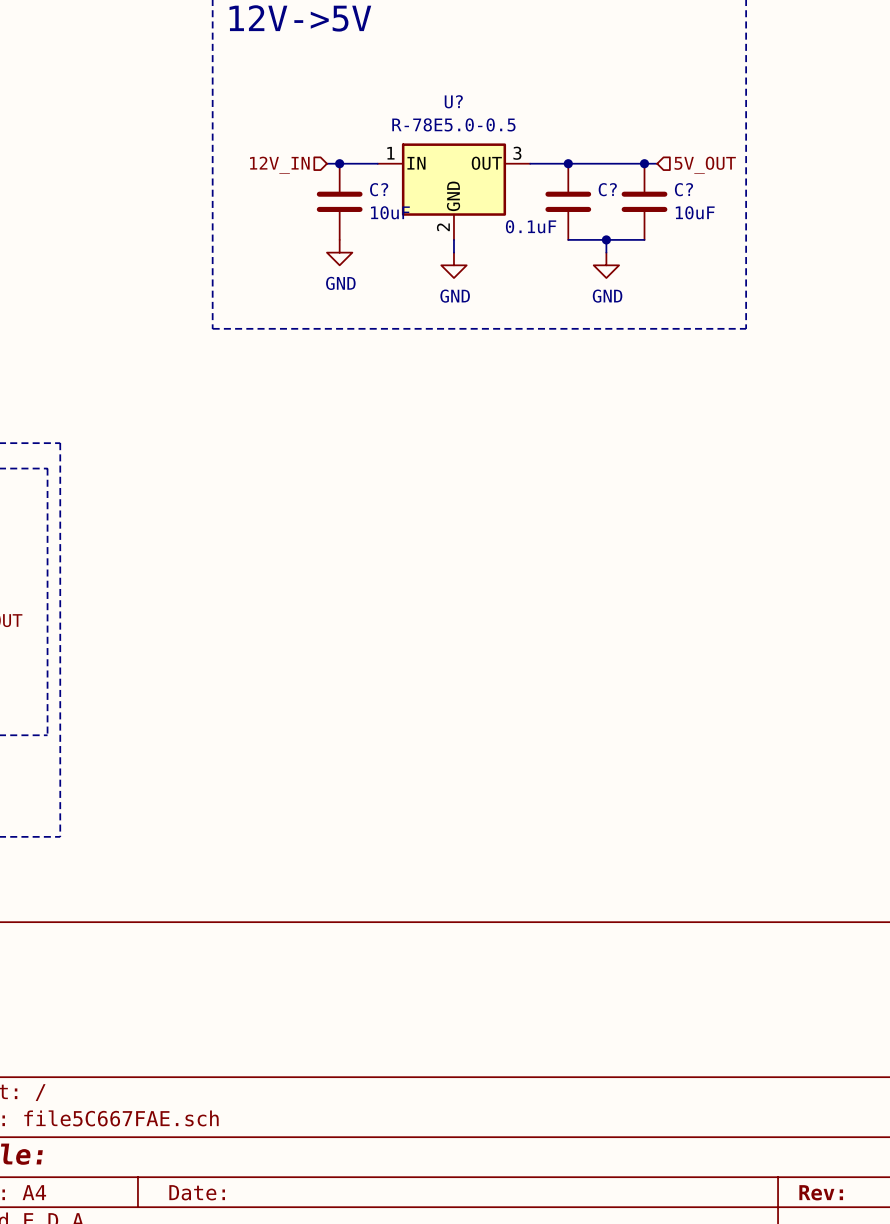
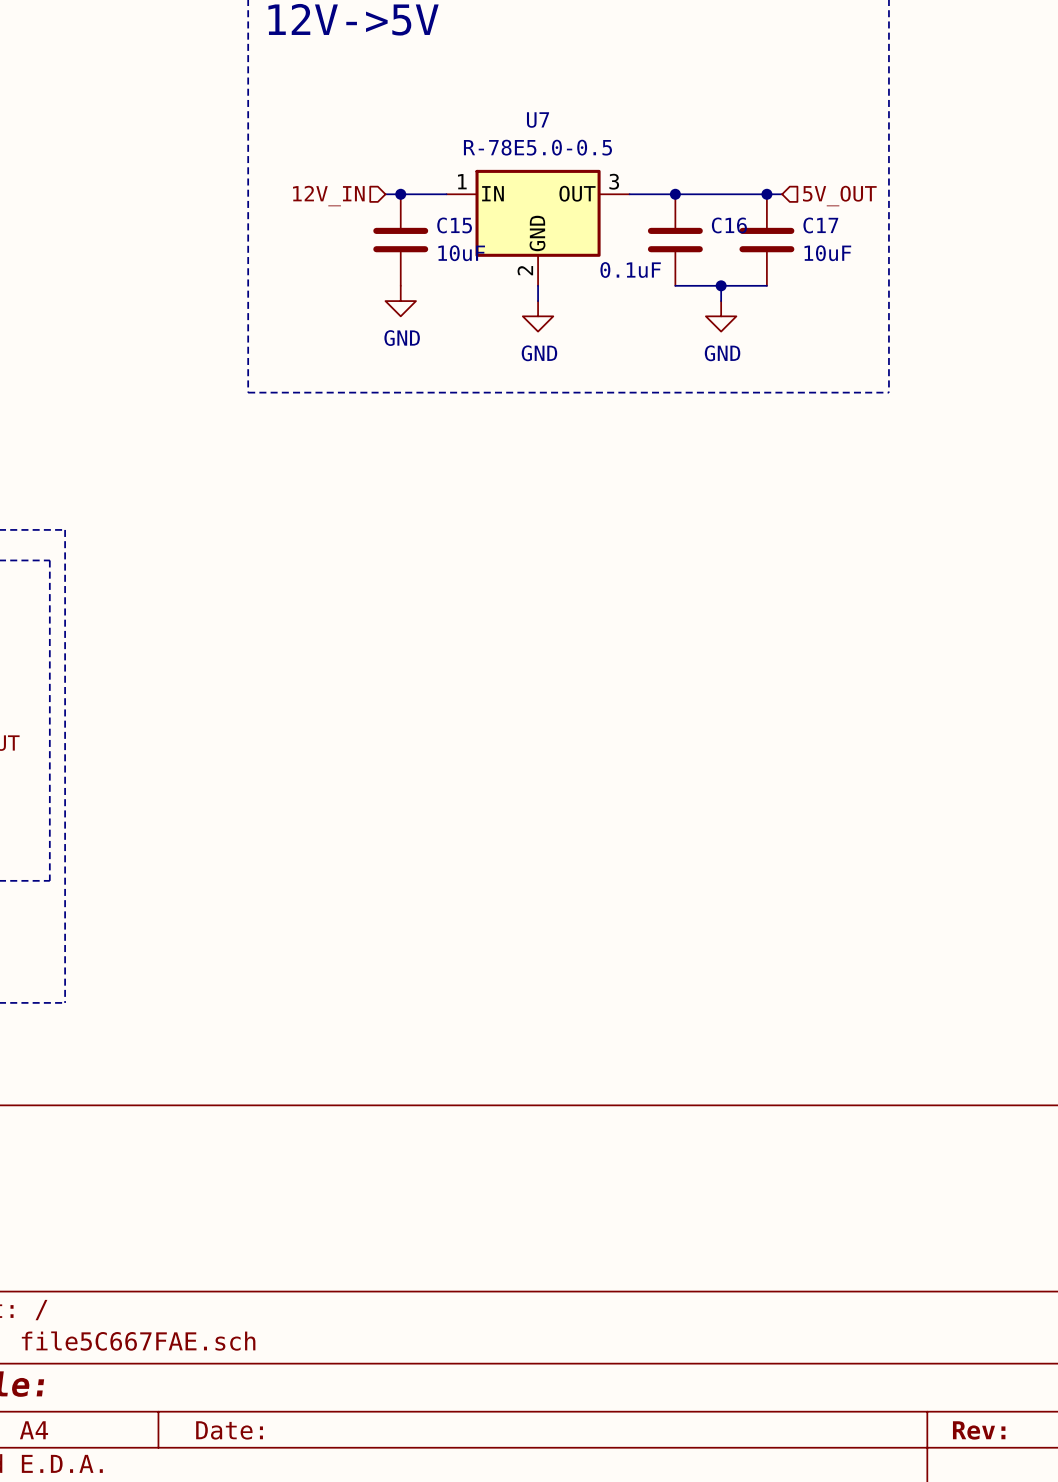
U? name: U? (453, 101) -> U7 (538, 120)
C? name: C? (379, 189) -> C15 (454, 225)
C? name: C? (607, 189) -> C16 (729, 225)
C? name: C? (683, 189) -> C17 (820, 225)

